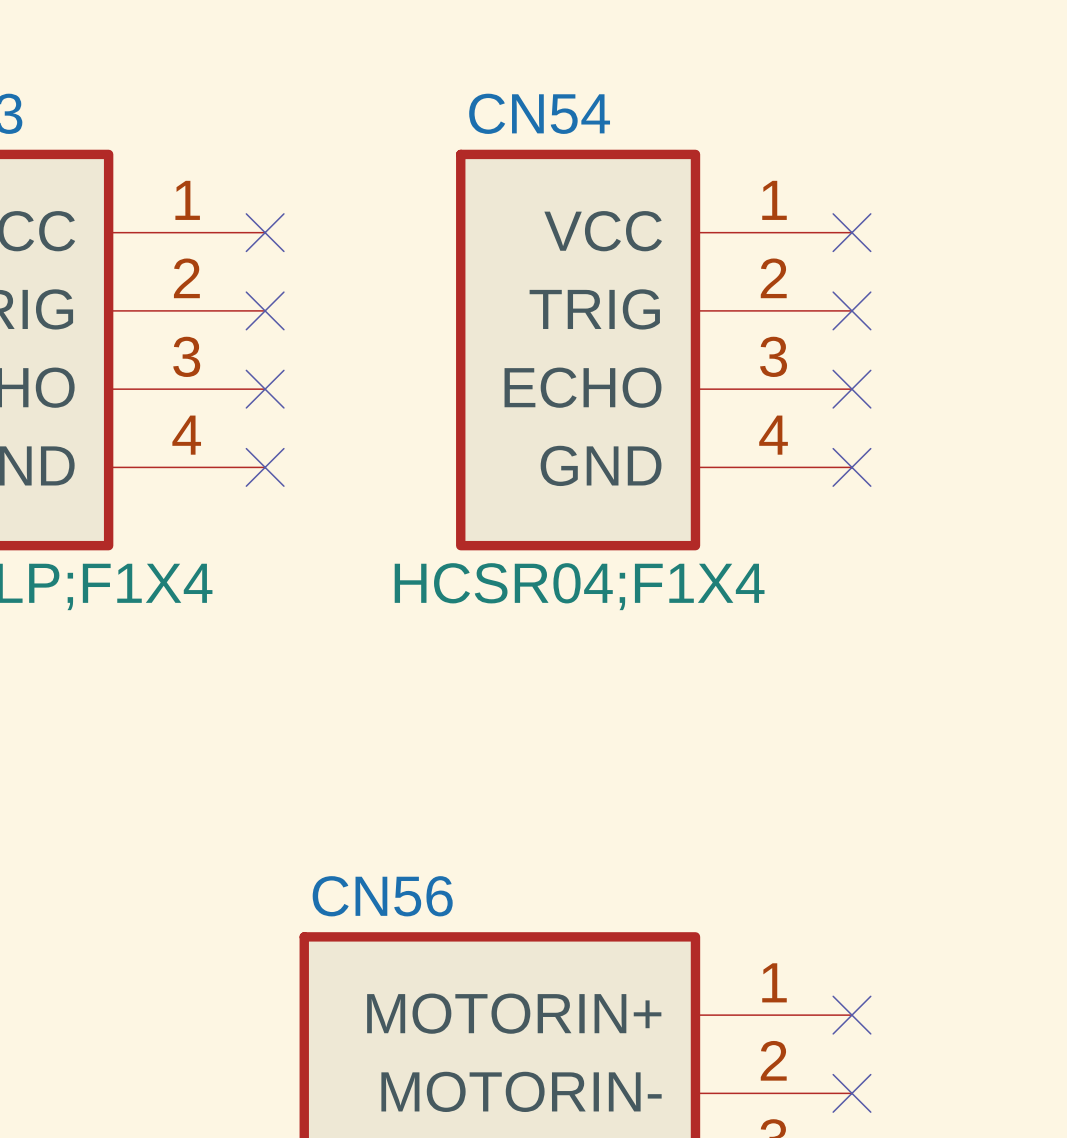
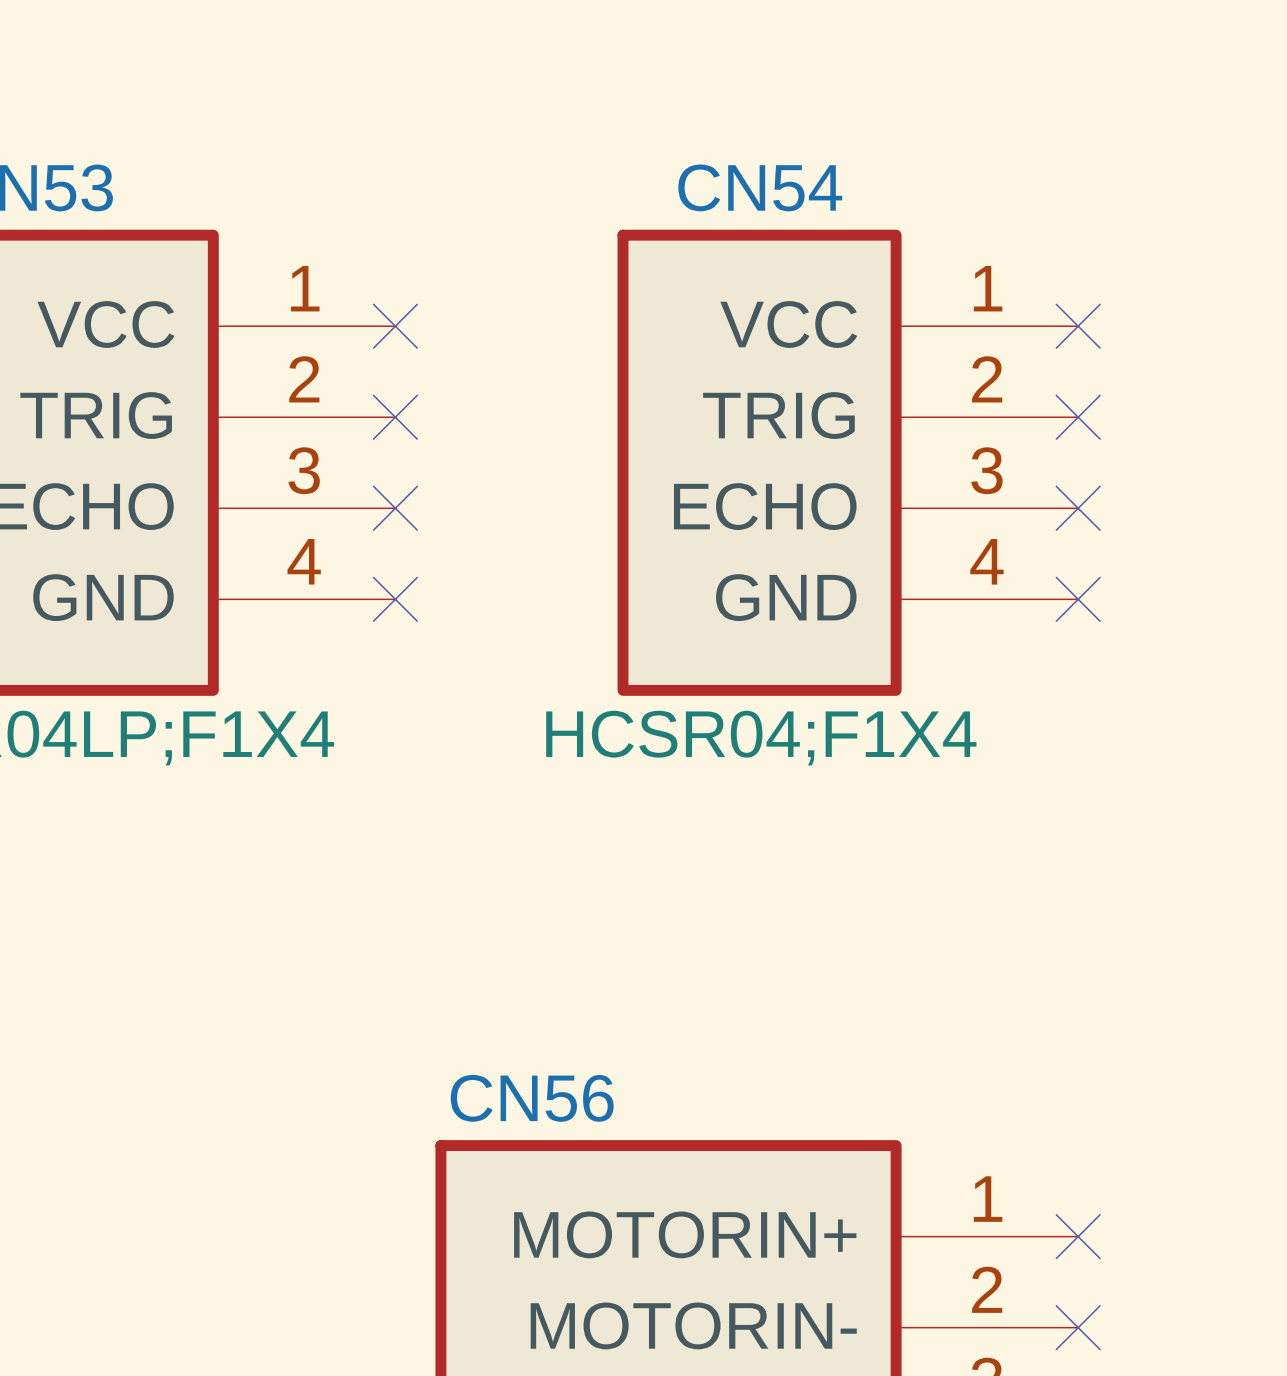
CN54 name position: CN54 (539, 113) -> CN54 (760, 187)

